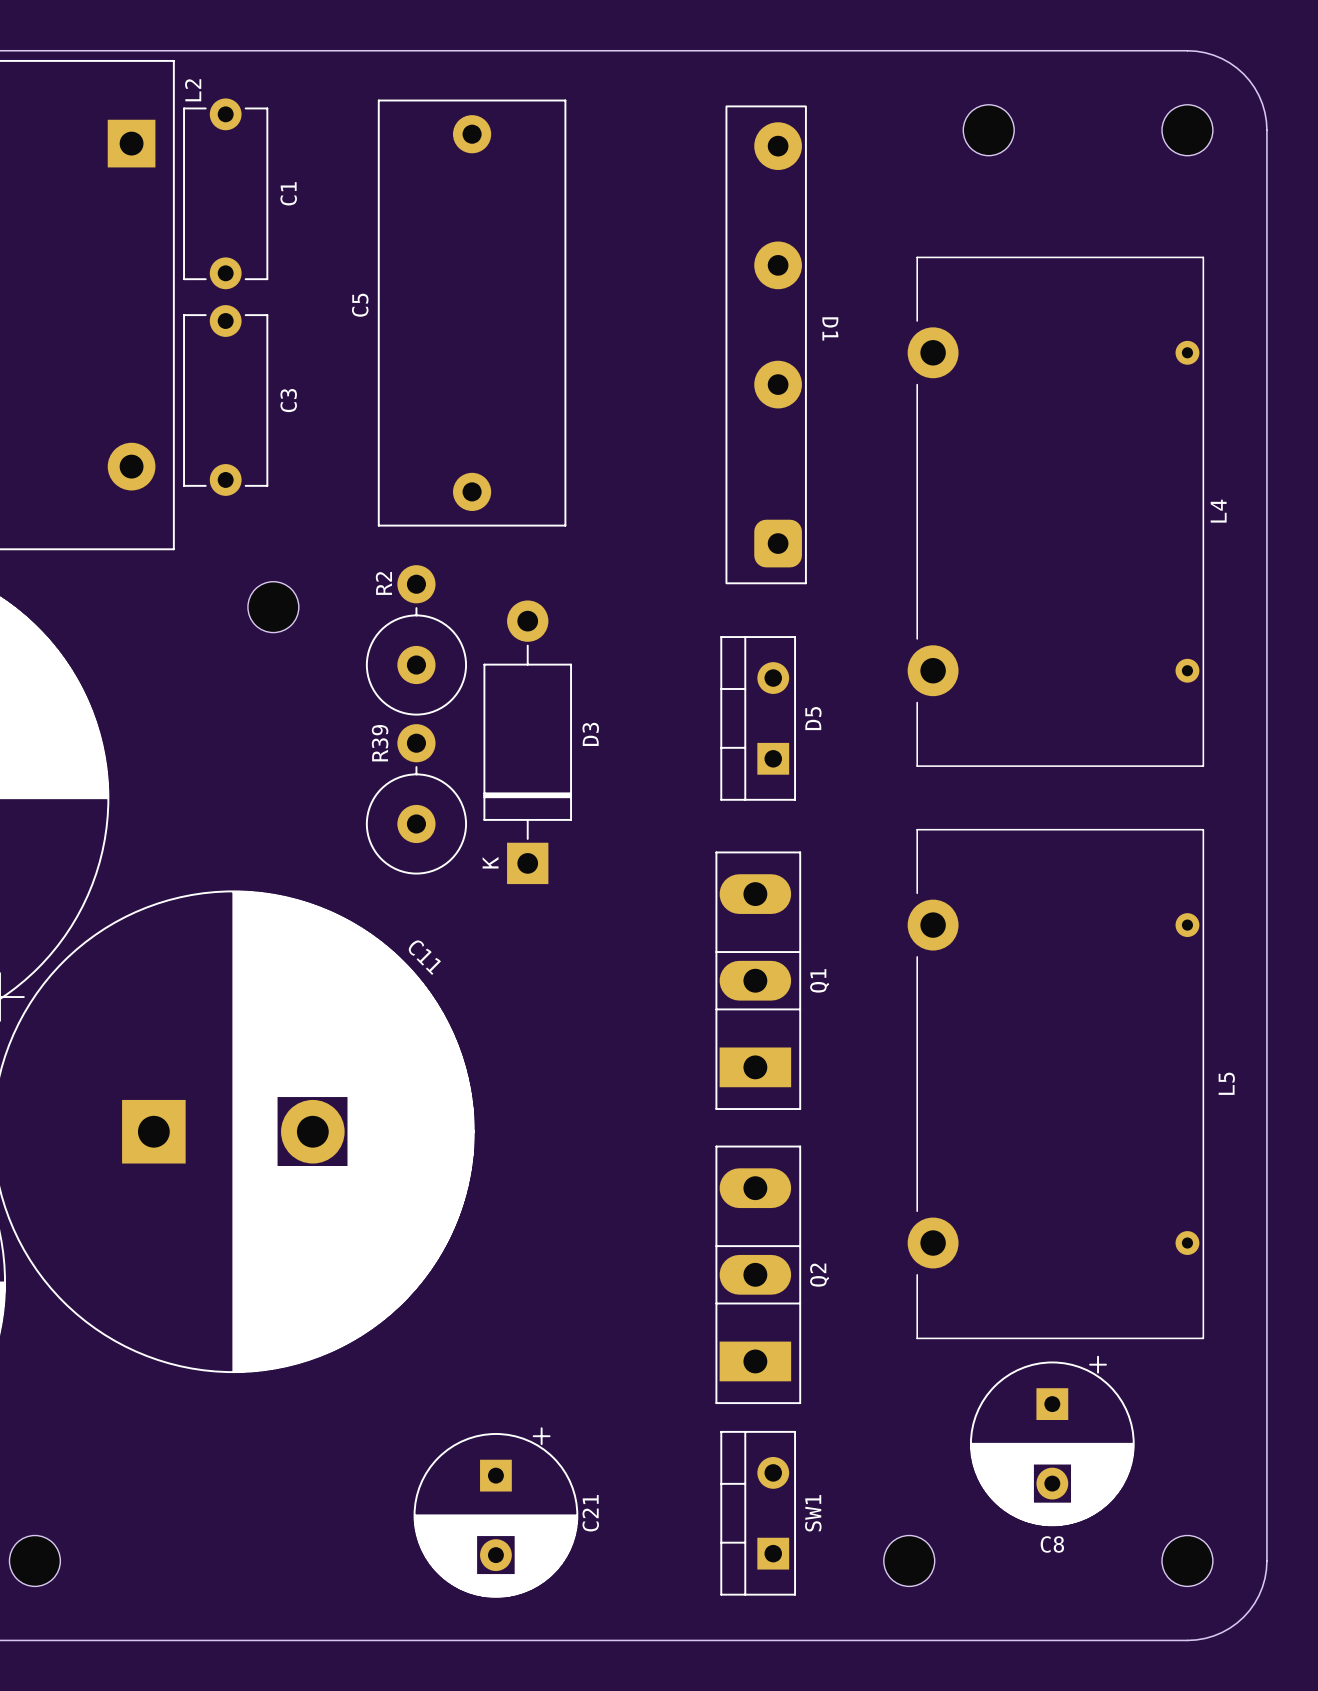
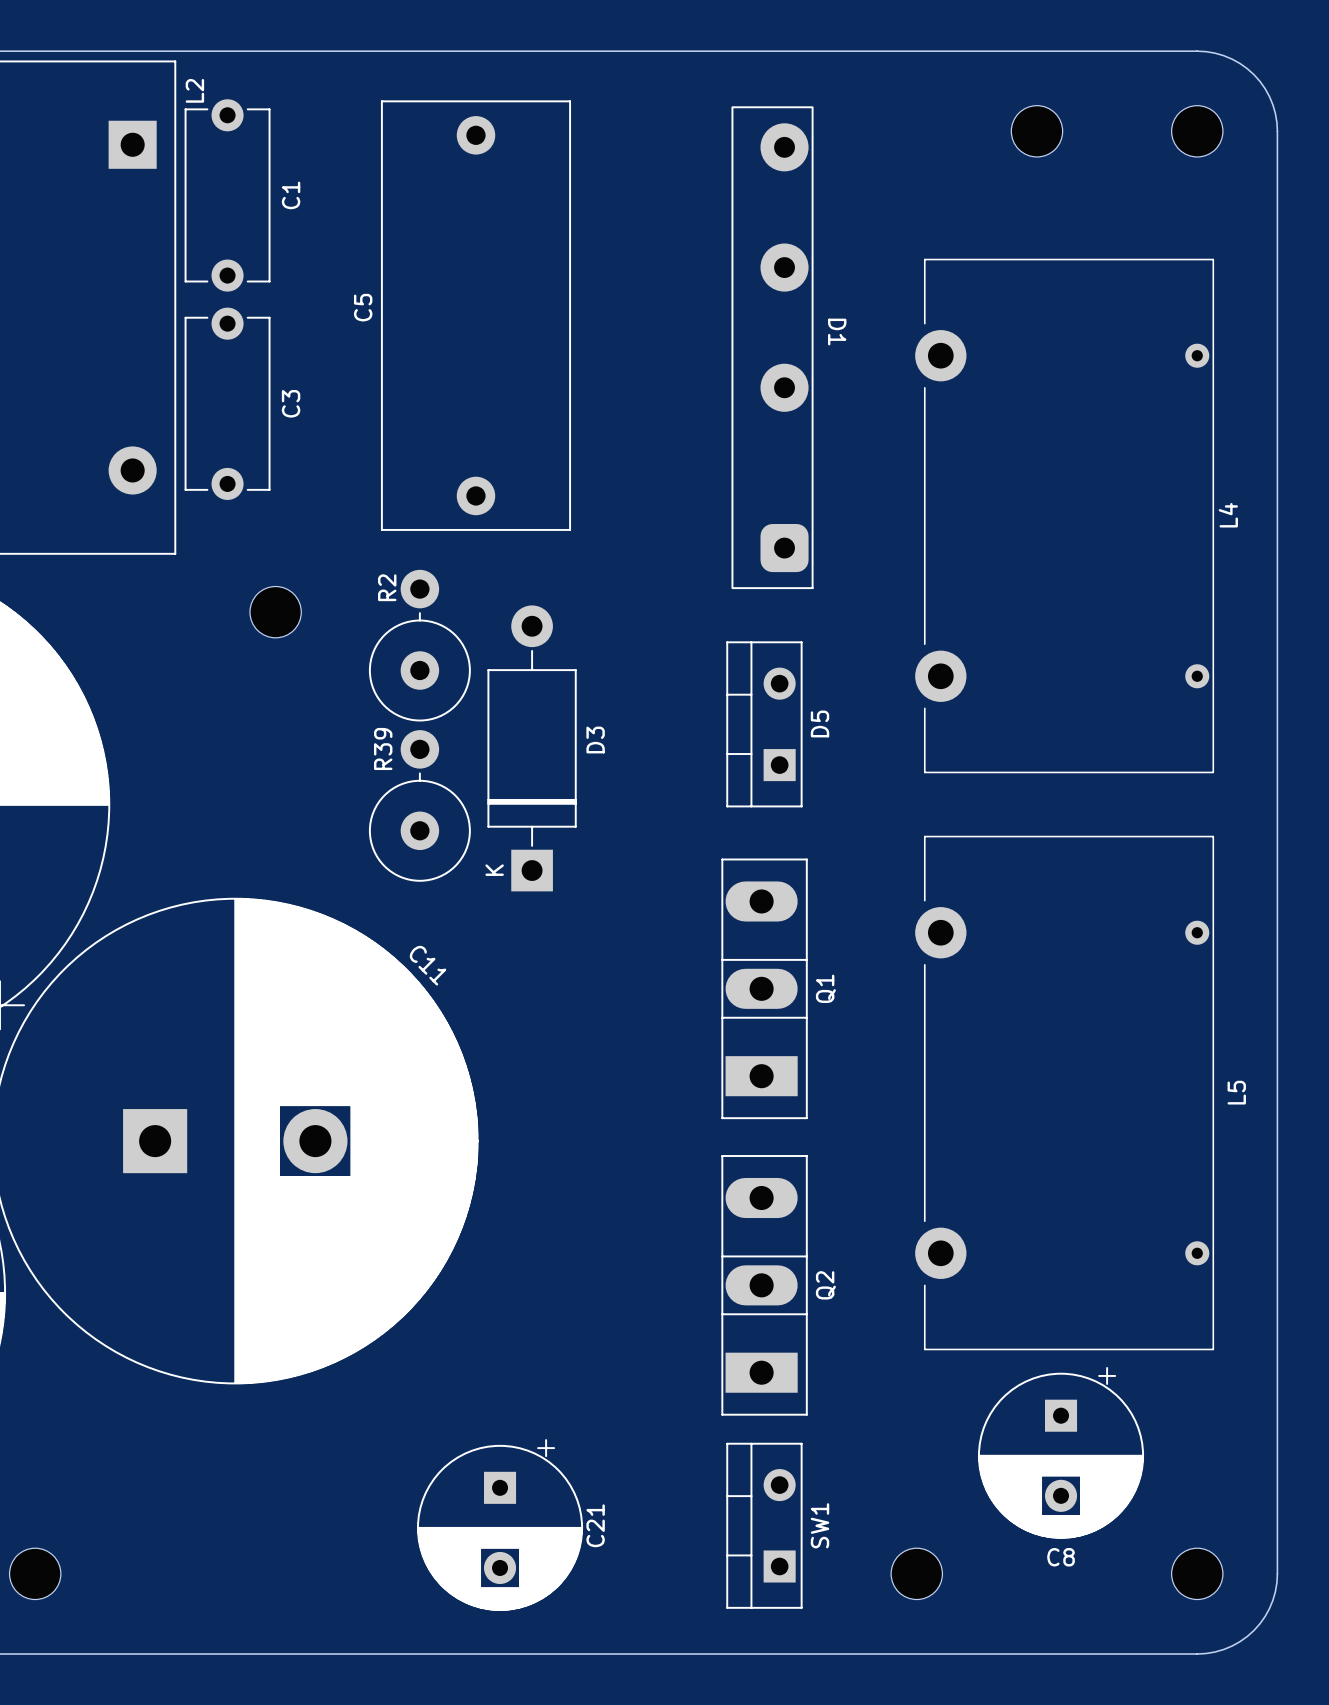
part position: (988, 130) -> (1036, 131)

